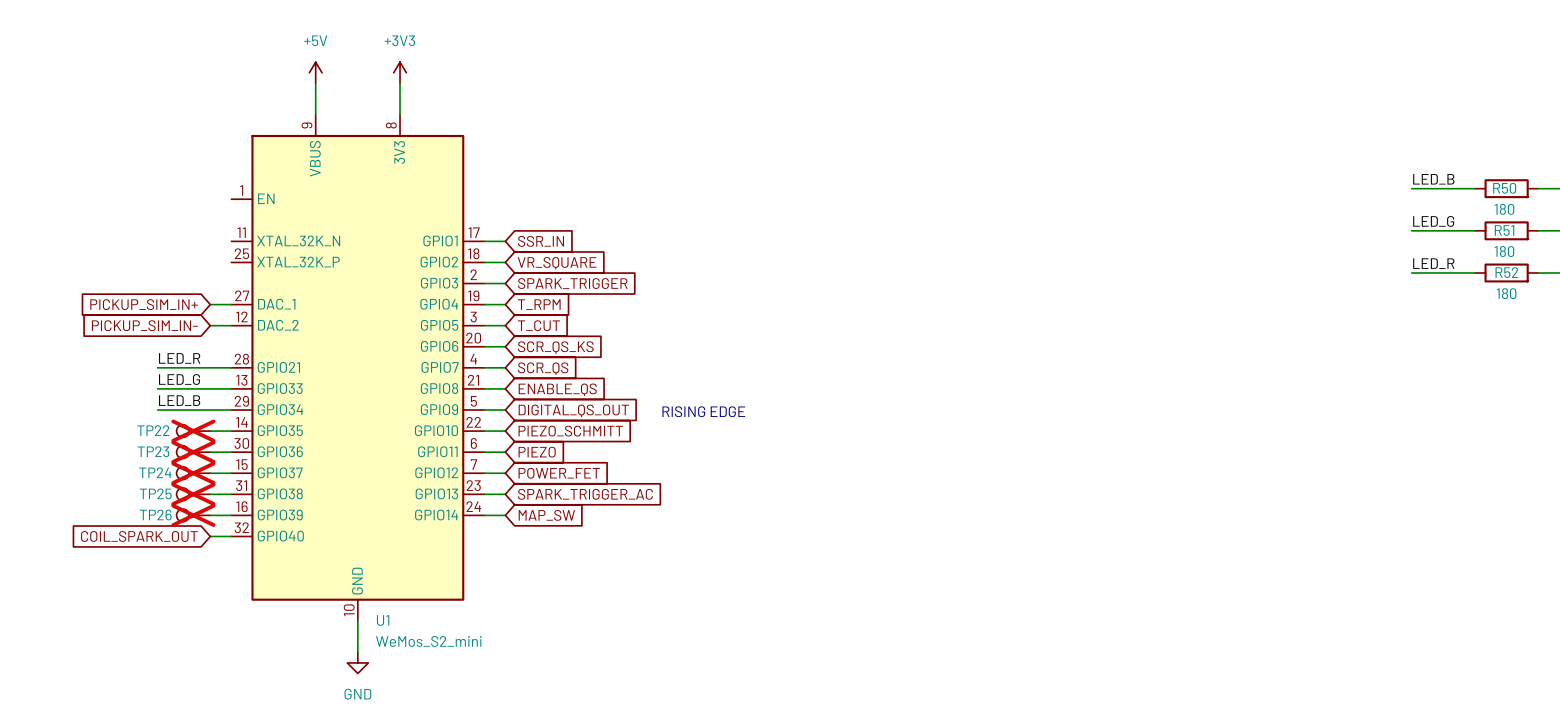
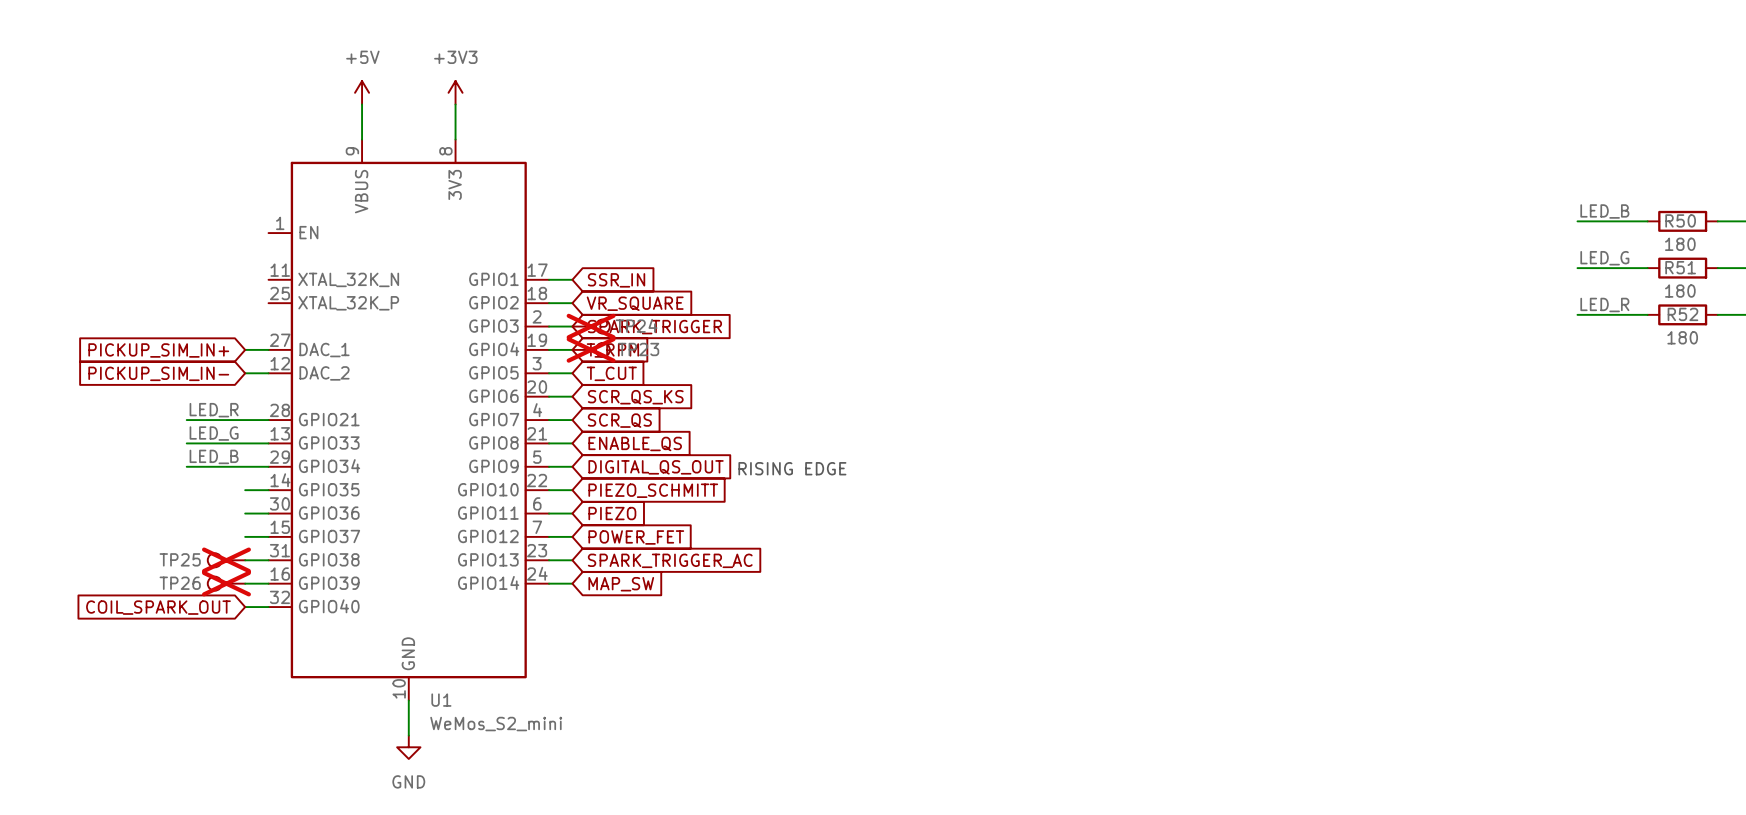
TP22: (193, 431) -> none
TP23 rotation: 0° (182, 452) -> 180° (602, 349)
TP23 position: (193, 452) -> (591, 349)
TP24 rotation: 0° (182, 473) -> 180° (602, 326)
TP24 position: (193, 473) -> (591, 326)

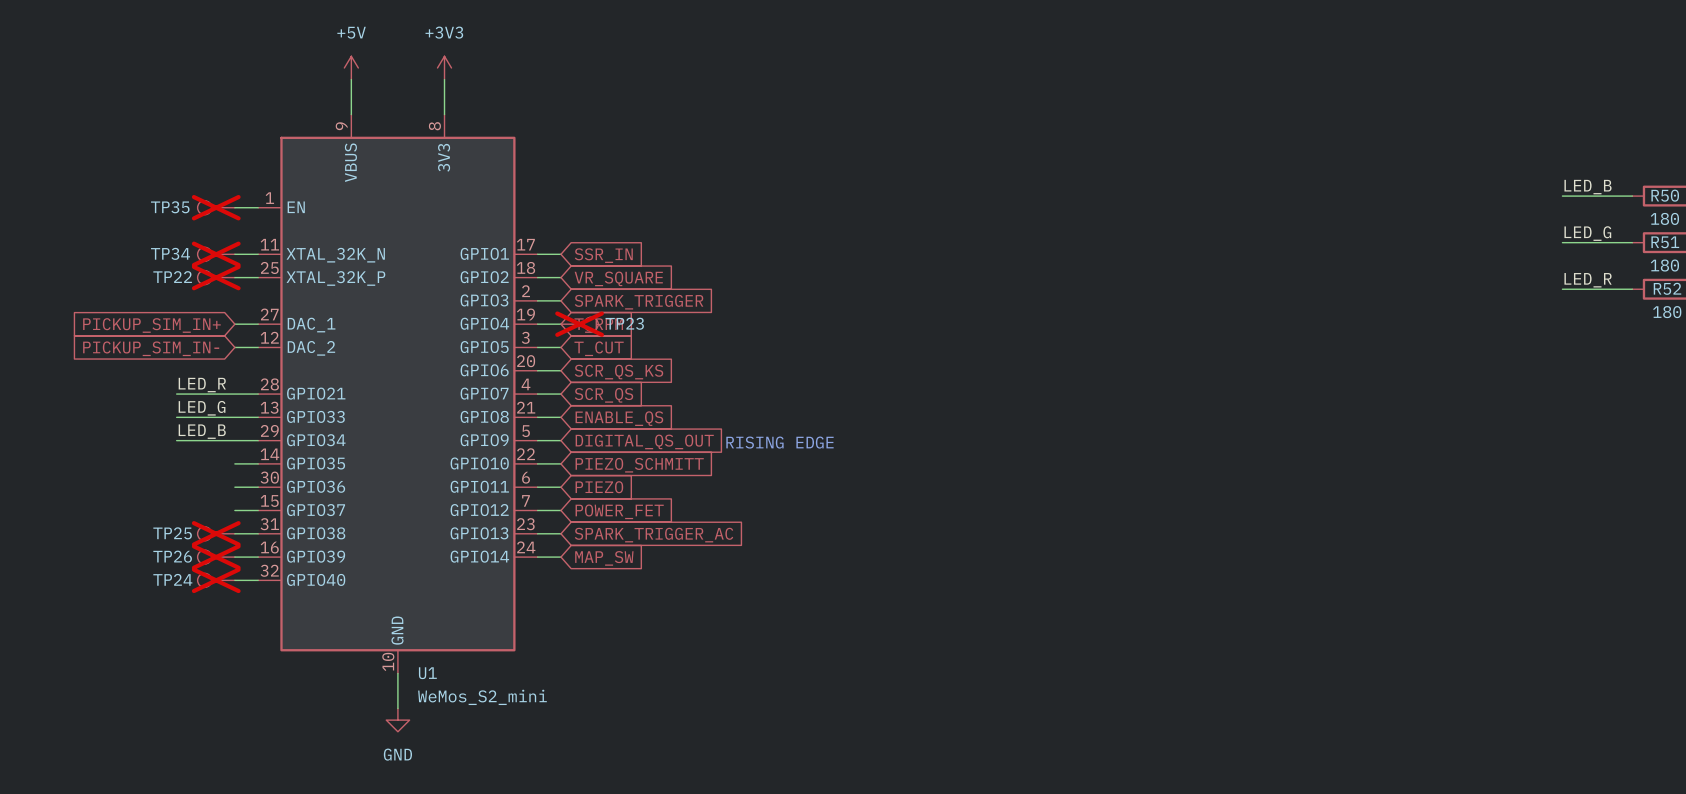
TP35: none -> (216, 207)
wire: none -> (234, 207) (258, 207)
TP34: none -> (216, 254)
wire: none -> (234, 254) (258, 254)
TP22: none -> (216, 277)
wire: none -> (234, 277) (258, 277)
TP24 position: (591, 326) -> (216, 580)
TP24 rotation: 0° (602, 326) -> 180° (204, 580)
global label: COIL_SPARK_OUT (158, 607) -> none

